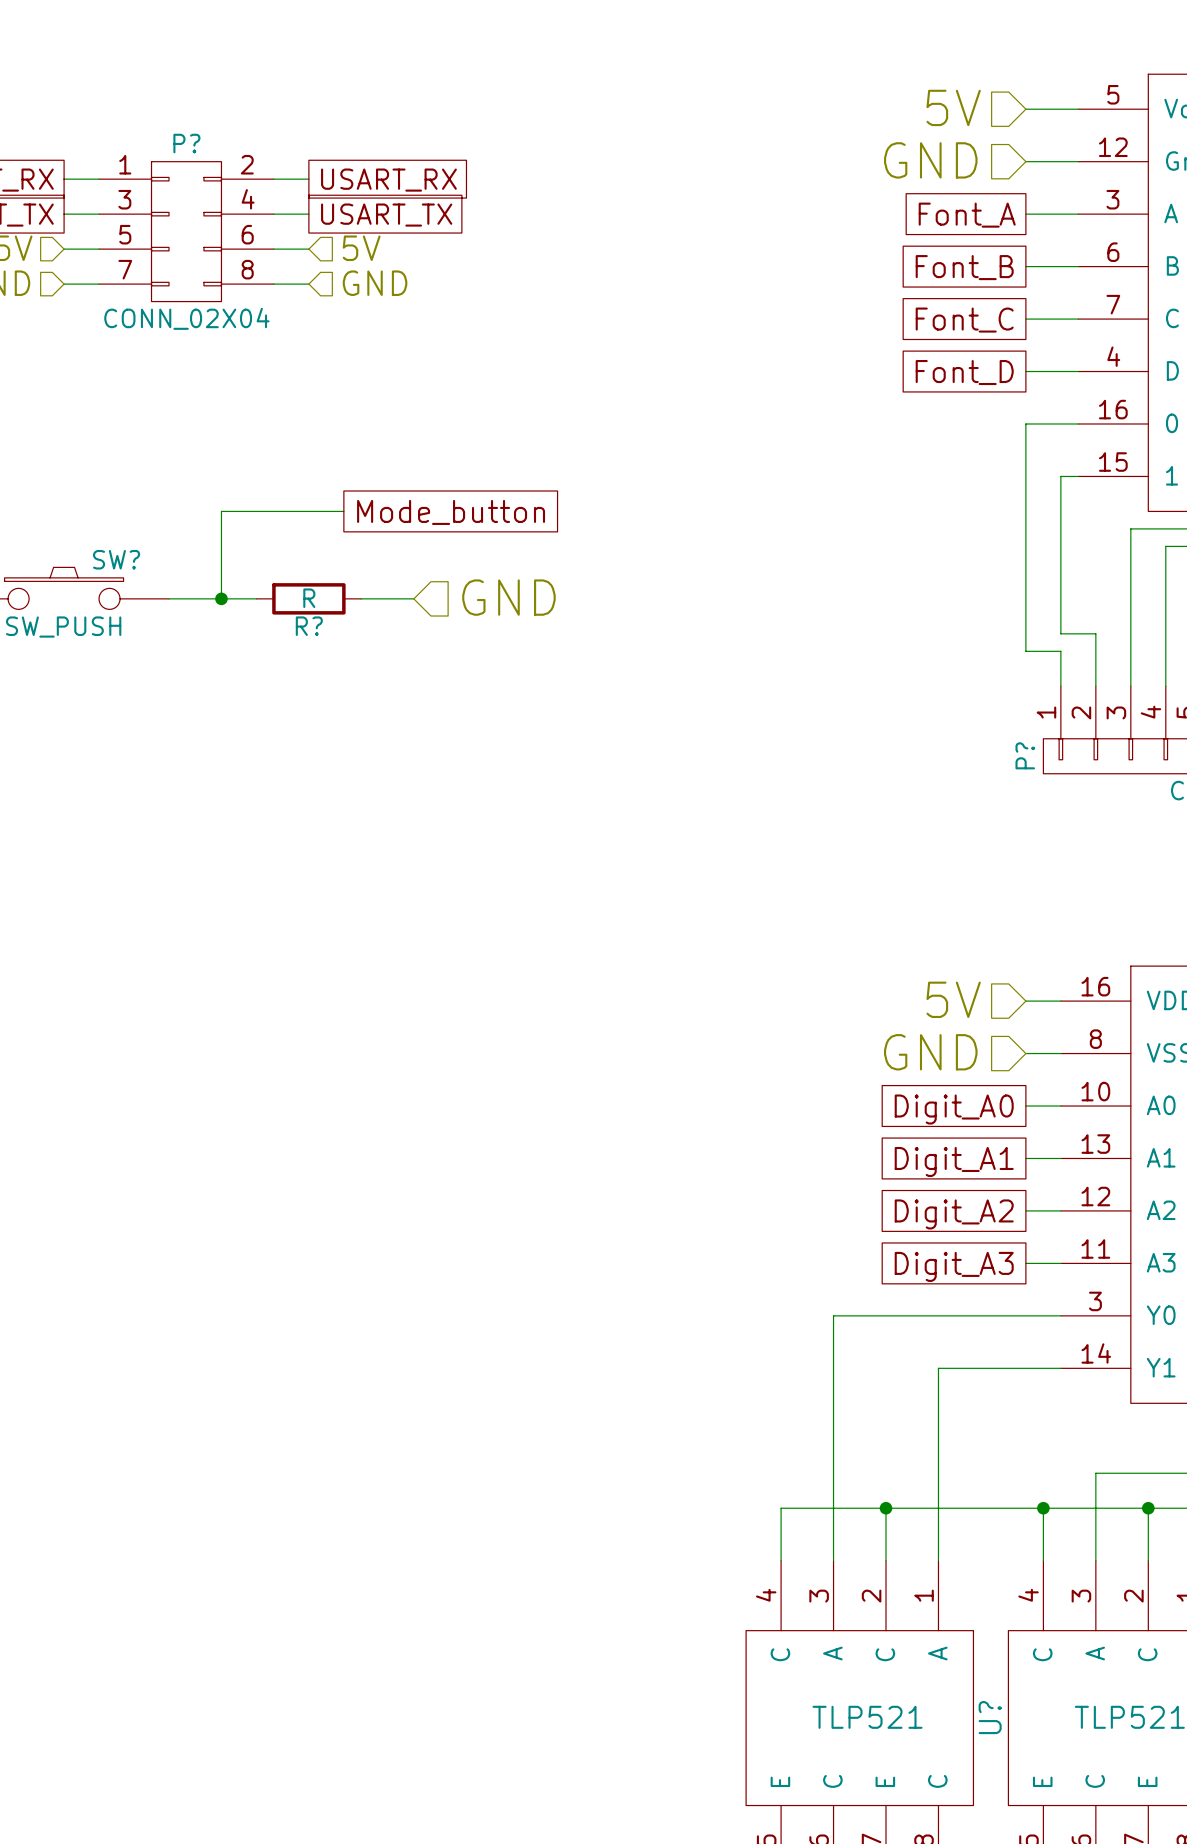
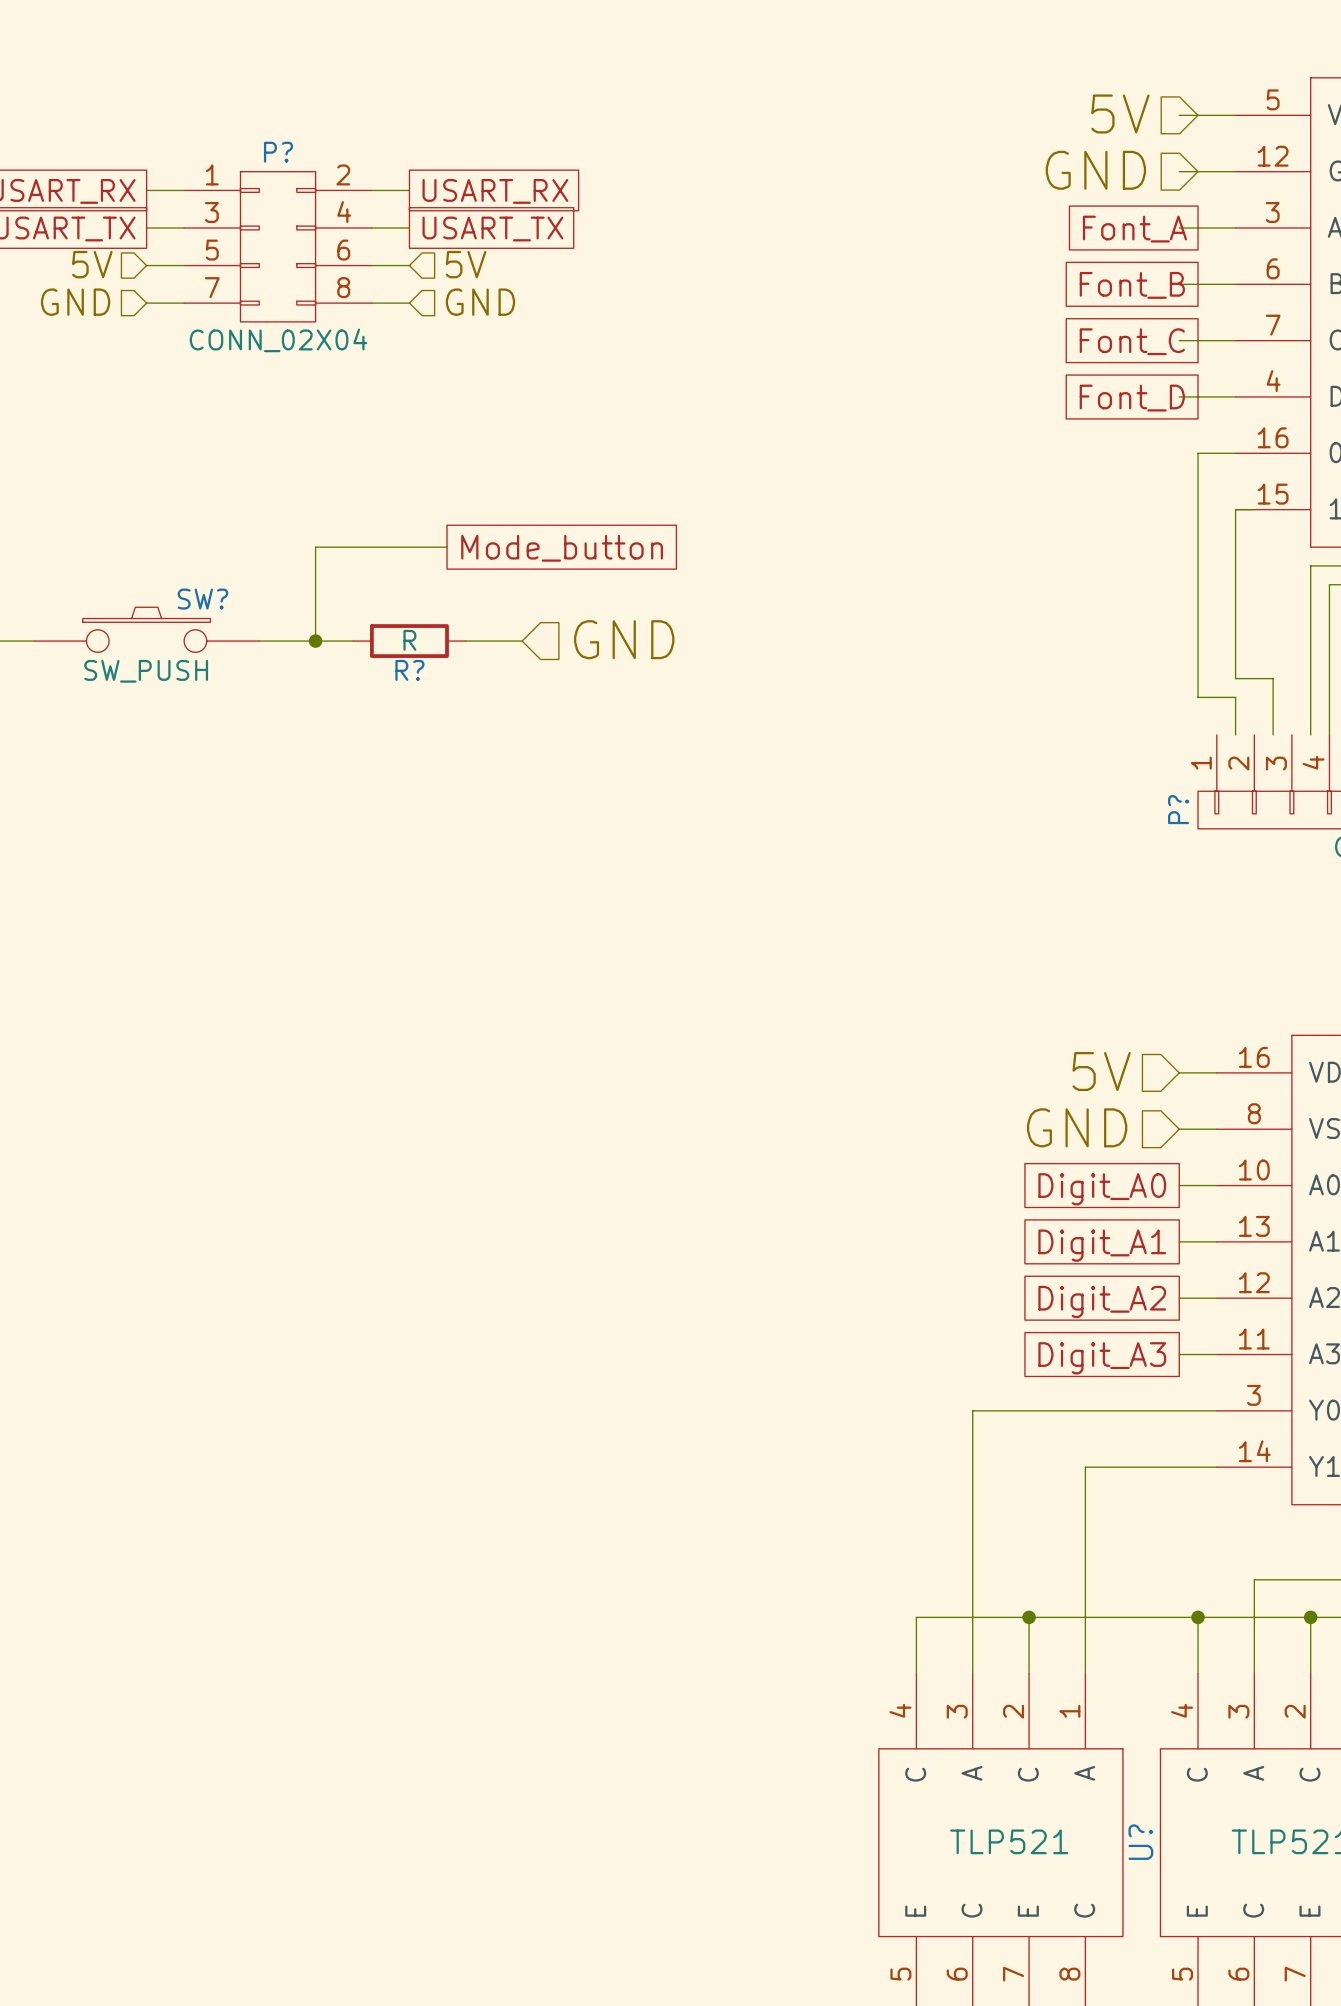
hierarchical label position: 5V (953, 107) -> 5V (1120, 113)
hierarchical label position: GND (930, 160) -> GND (1095, 170)
global label position: Font_A (967, 215) -> Font_A (1134, 229)
global label position: Font_B (964, 267) -> Font_B (1132, 285)
global label position: Font_C (964, 320) -> Font_C (1132, 341)
global label position: Font_D (964, 372) -> Font_D (1132, 398)
wire: (1043, 423) (1025, 423) (1025, 651) (1043, 651) -> (1198, 453) (1198, 697)
wire: (1078, 476) (1060, 476) (1060, 633) (1078, 633) -> (1254, 509) (1235, 509) (1235, 678)
wire: (1148, 528) (1130, 528) (1130, 686) -> (1310, 565) (1310, 734)
wire: (1095, 633) (1095, 686) -> (1254, 678) (1273, 678) (1273, 734)
wire: (1060, 651) (1060, 686) -> (1216, 697) (1235, 697) (1235, 734)

